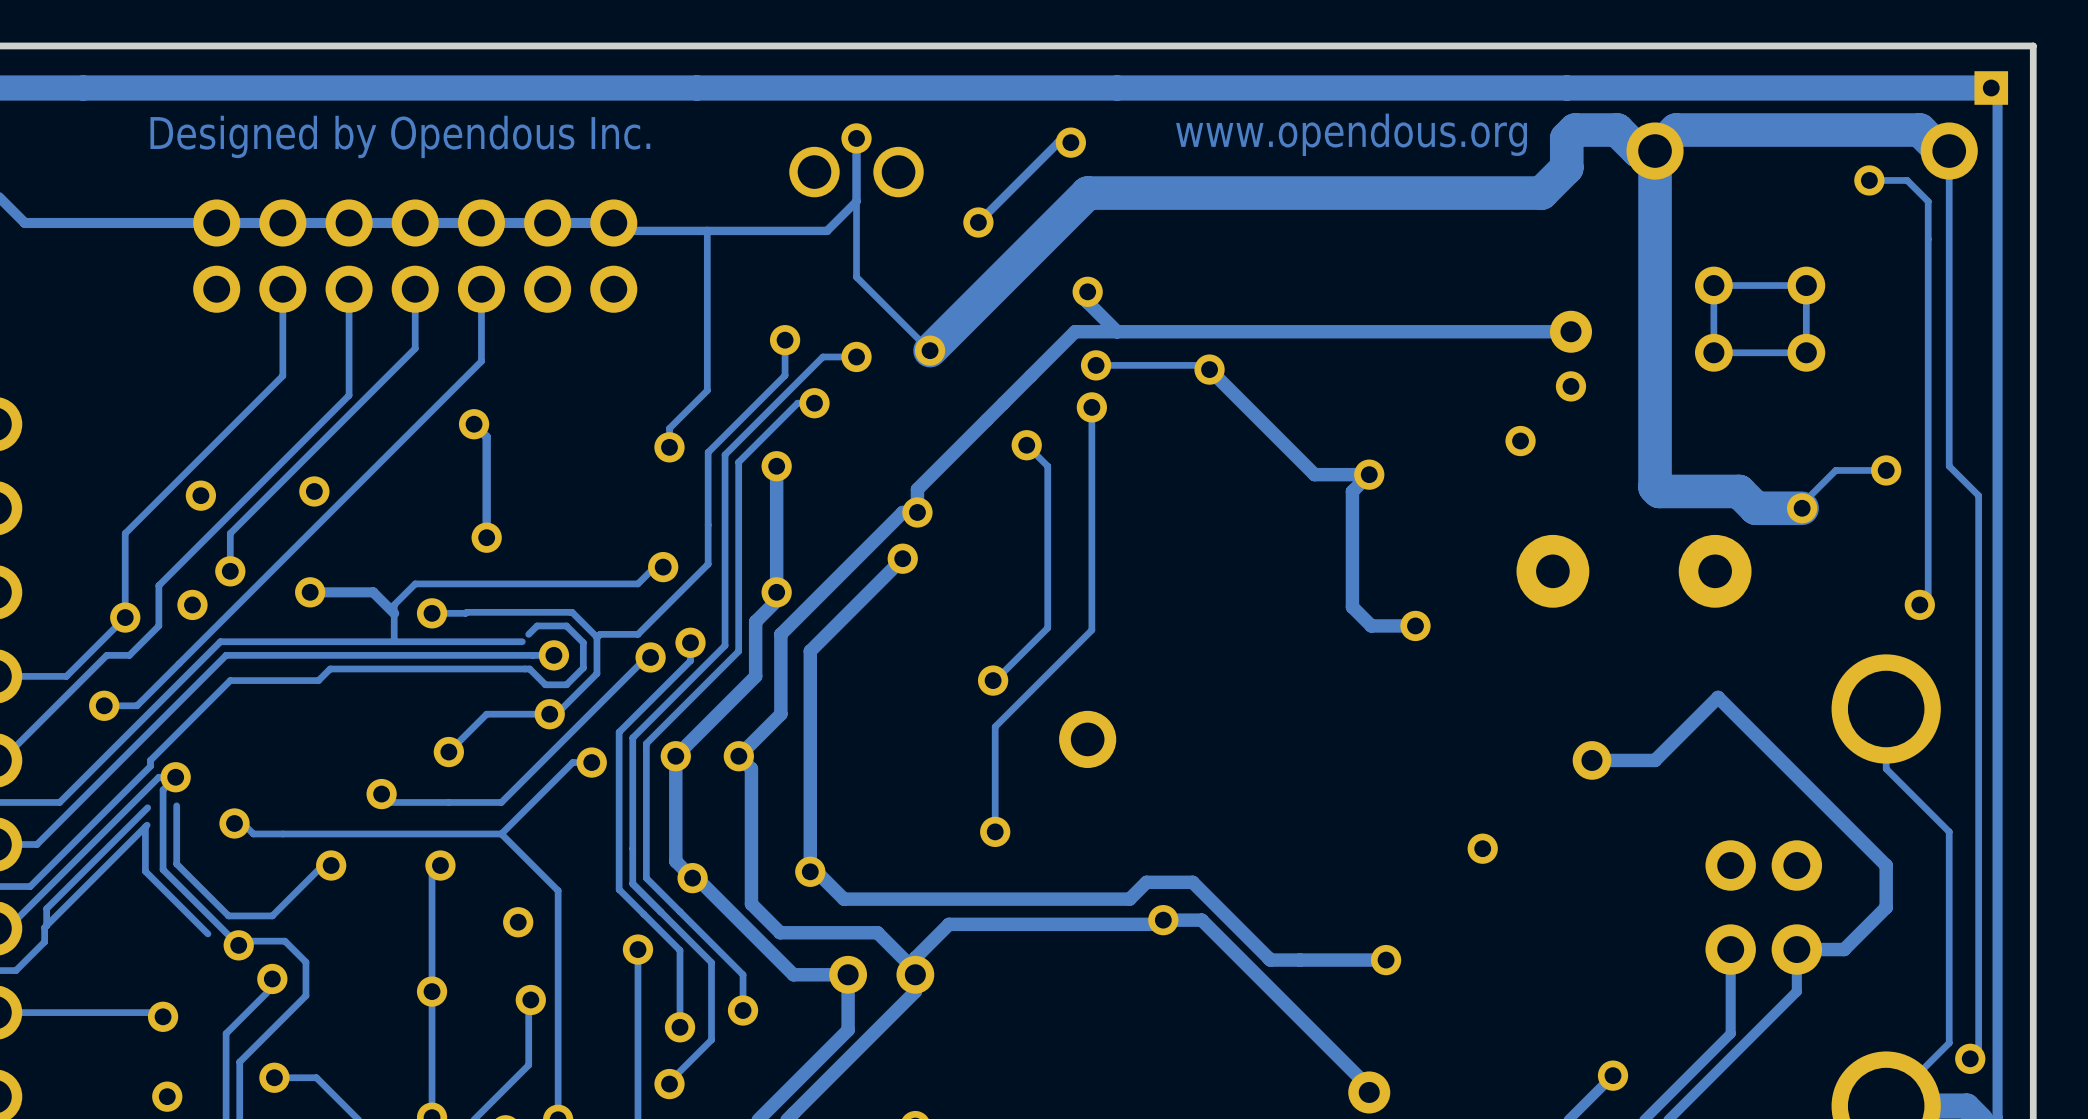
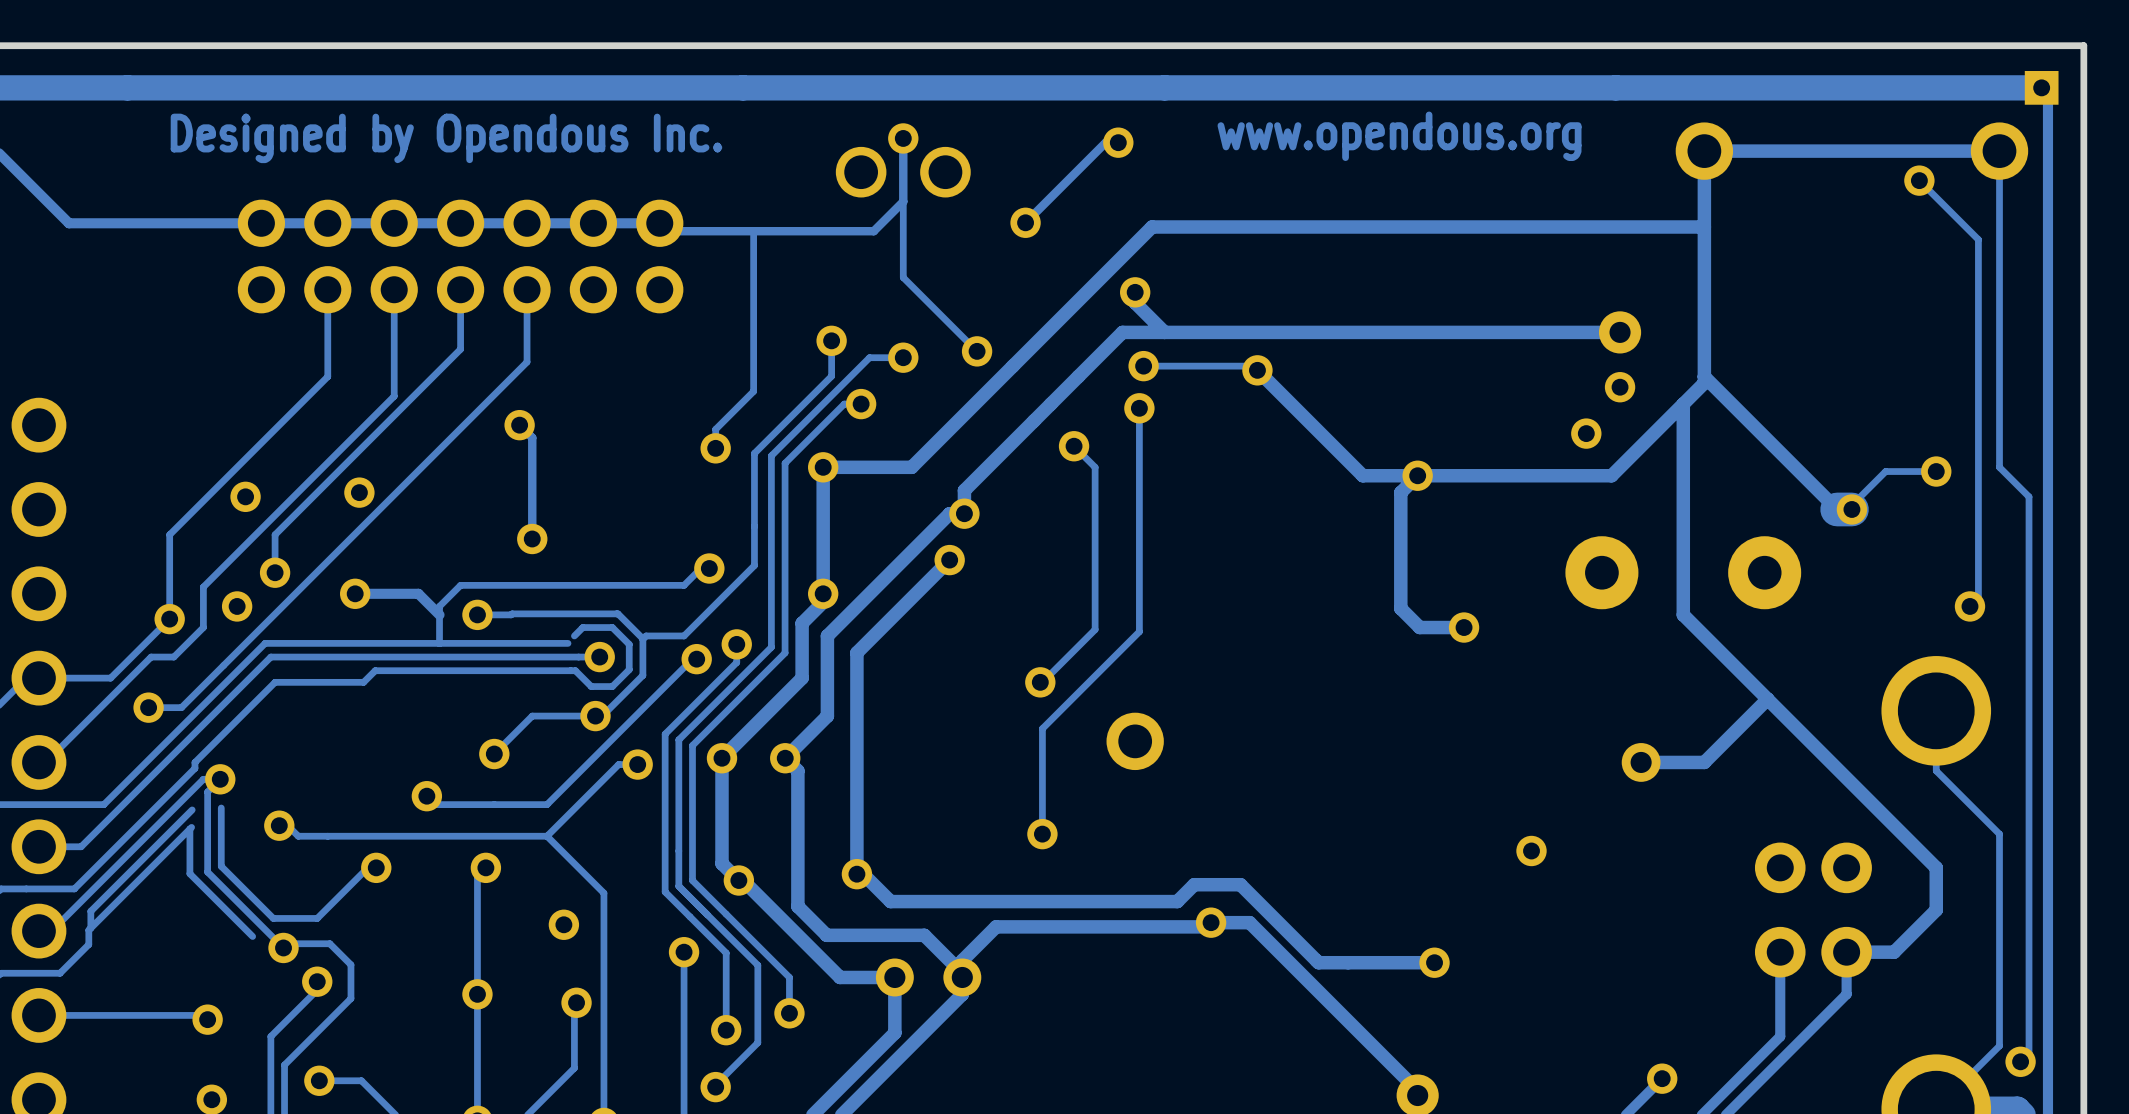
track width: thick (1655, 151) (1655, 382) -> thin (1704, 151) (1704, 382)
track: (1940, 151) (1919, 130) (1676, 130) (1655, 151) (1638, 151) (1617, 130) (1575, 130) (1566, 138) (1566, 167) (1541, 193) (1087, 193) (930, 350) -> (1991, 151) (1704, 151)
track: (1869, 180) (1907, 180) (1928, 201) (1928, 239) -> (1919, 180) (1978, 239)
track: none -> (1704, 227) (1152, 227) (911, 467) (823, 467)
part: (1713, 285) -> none
track: (1806, 285) (1806, 352) (1713, 352) (1713, 285) (1806, 285) -> none
part: (1806, 285) -> none
part: (1713, 352) -> none
part: (1806, 352) -> none
track: (1655, 382) (1655, 487) (1659, 491) (1739, 491) (1755, 508) (1787, 508) -> (1704, 376) (1837, 509)
track: none -> (1704, 382) (1611, 475) (1417, 475)
track: none -> (1683, 404) (1683, 614) (1767, 699)
part position: (1520, 441) -> (1586, 433)

